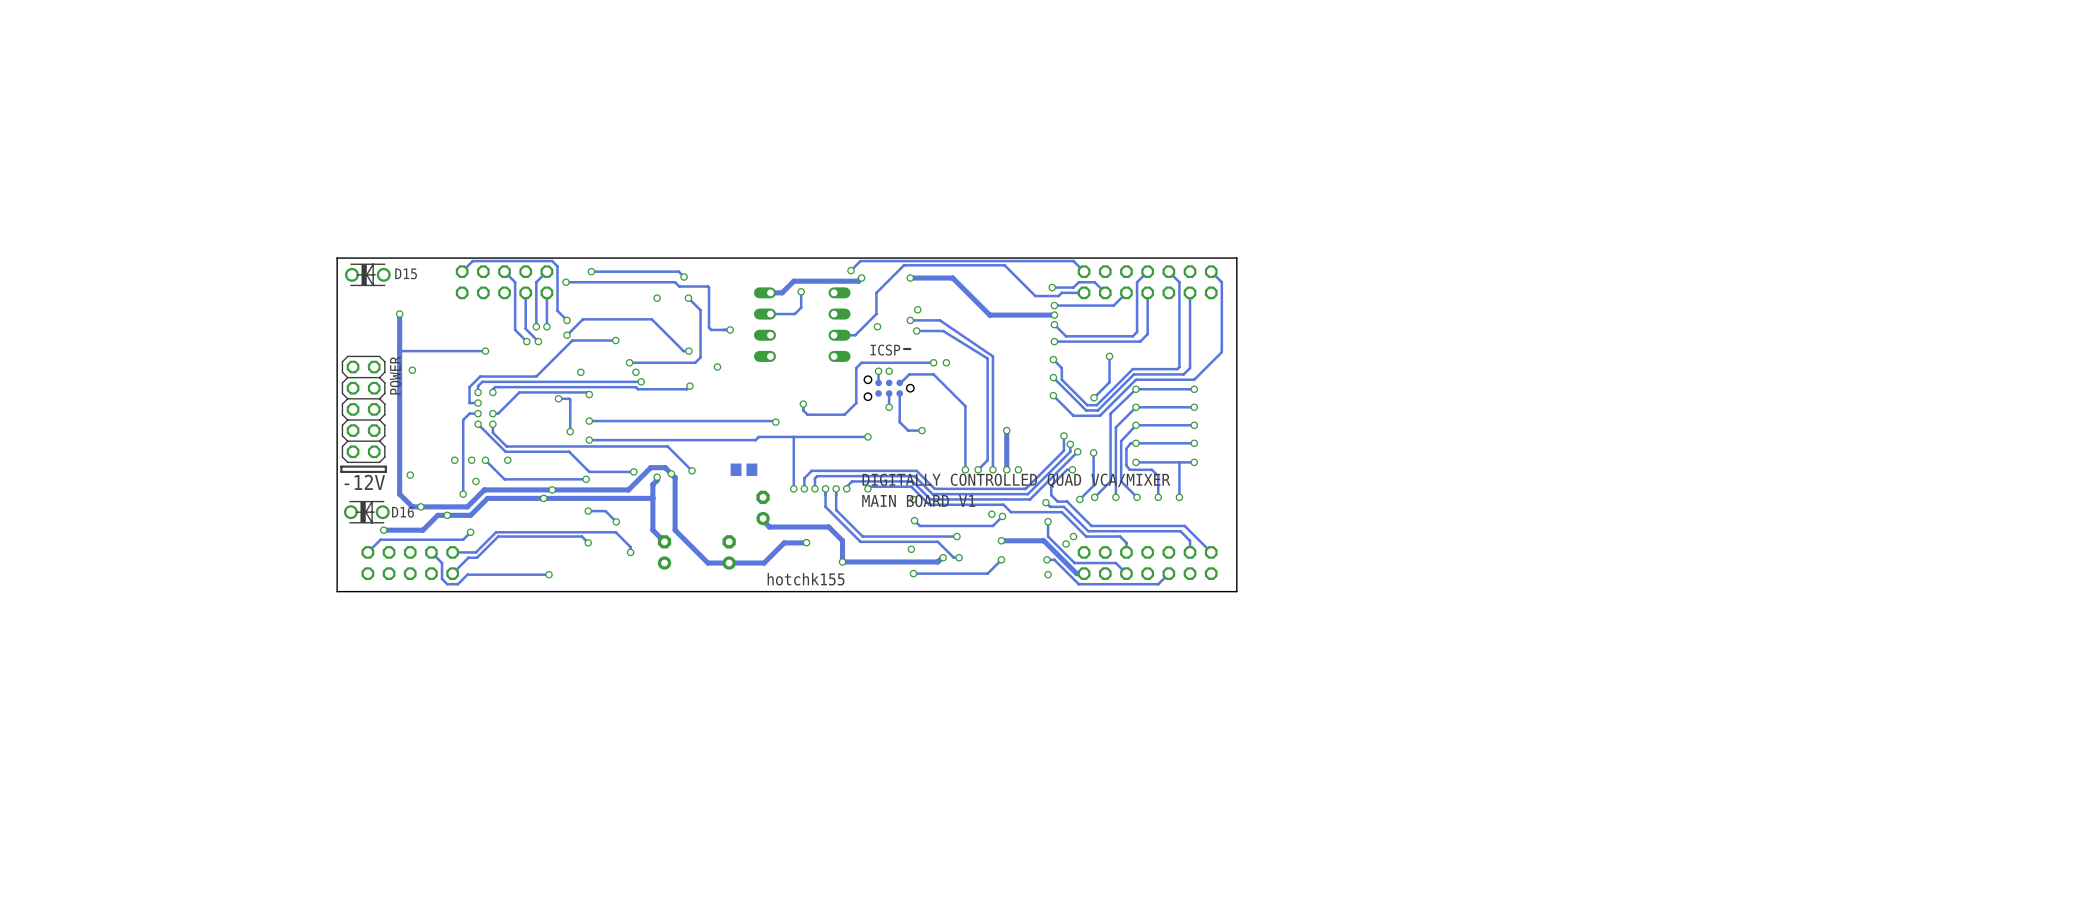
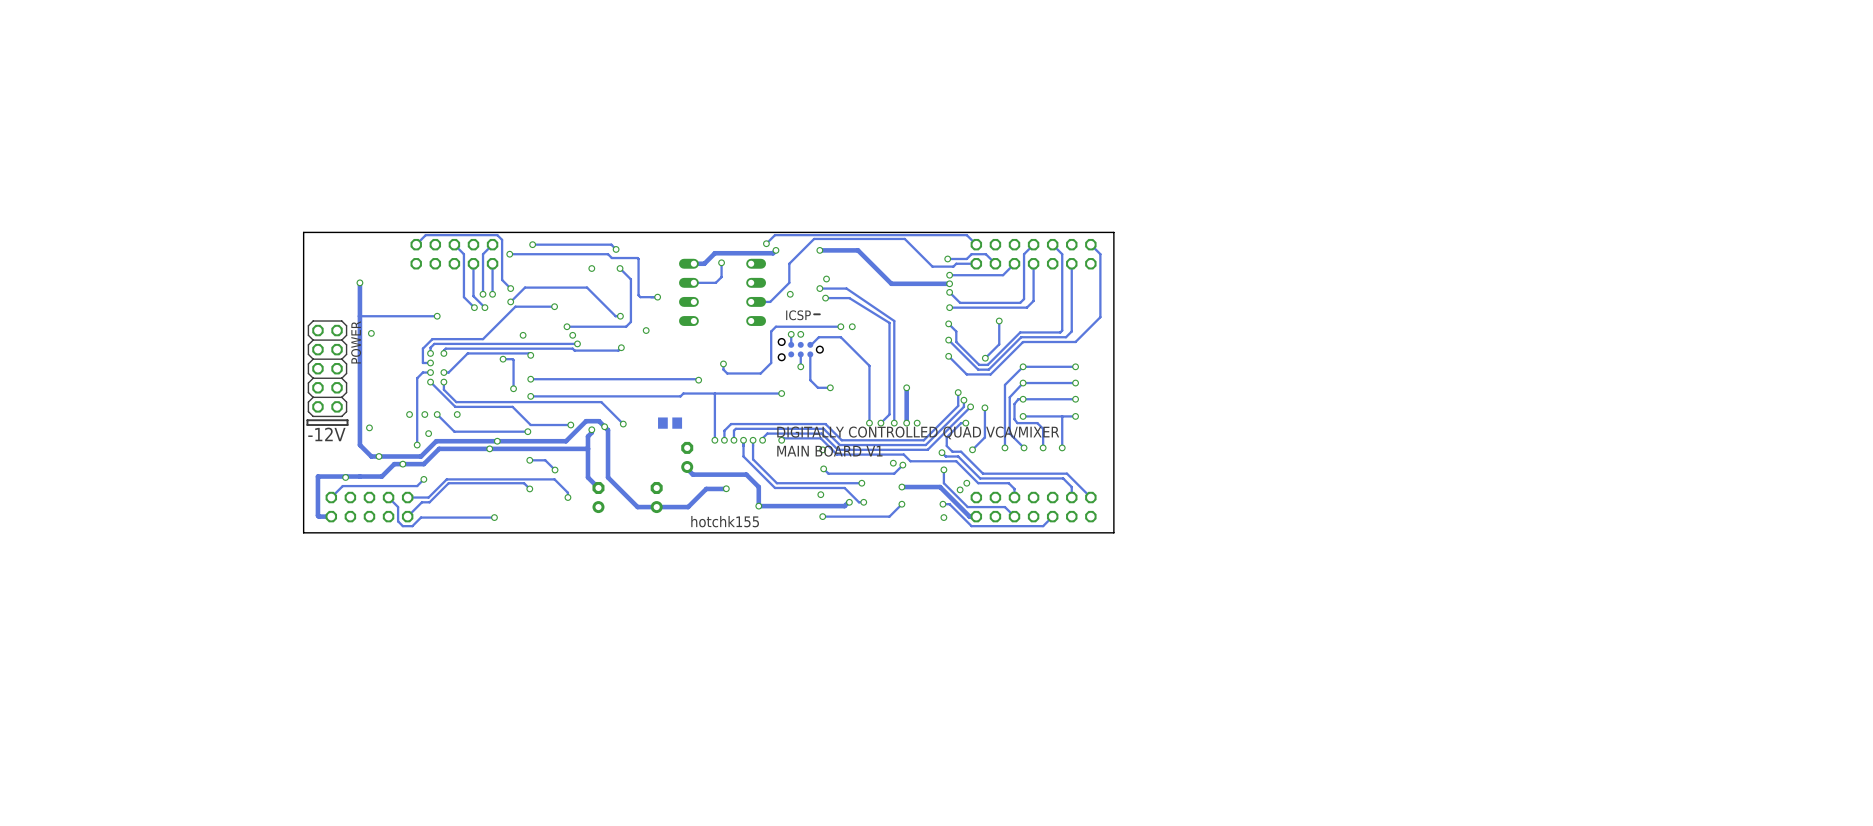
D15: (367, 274) -> none
via: (1136, 389) -> none
track: (1194, 389) (1136, 389) (1110, 413) (1110, 481) (1094, 497) -> none
via: (1194, 389) -> none
via: (1094, 497) -> none
D16: (366, 512) -> none
track: (424, 529) (383, 530) -> (381, 476) (317, 476) (317, 515) (331, 516)

